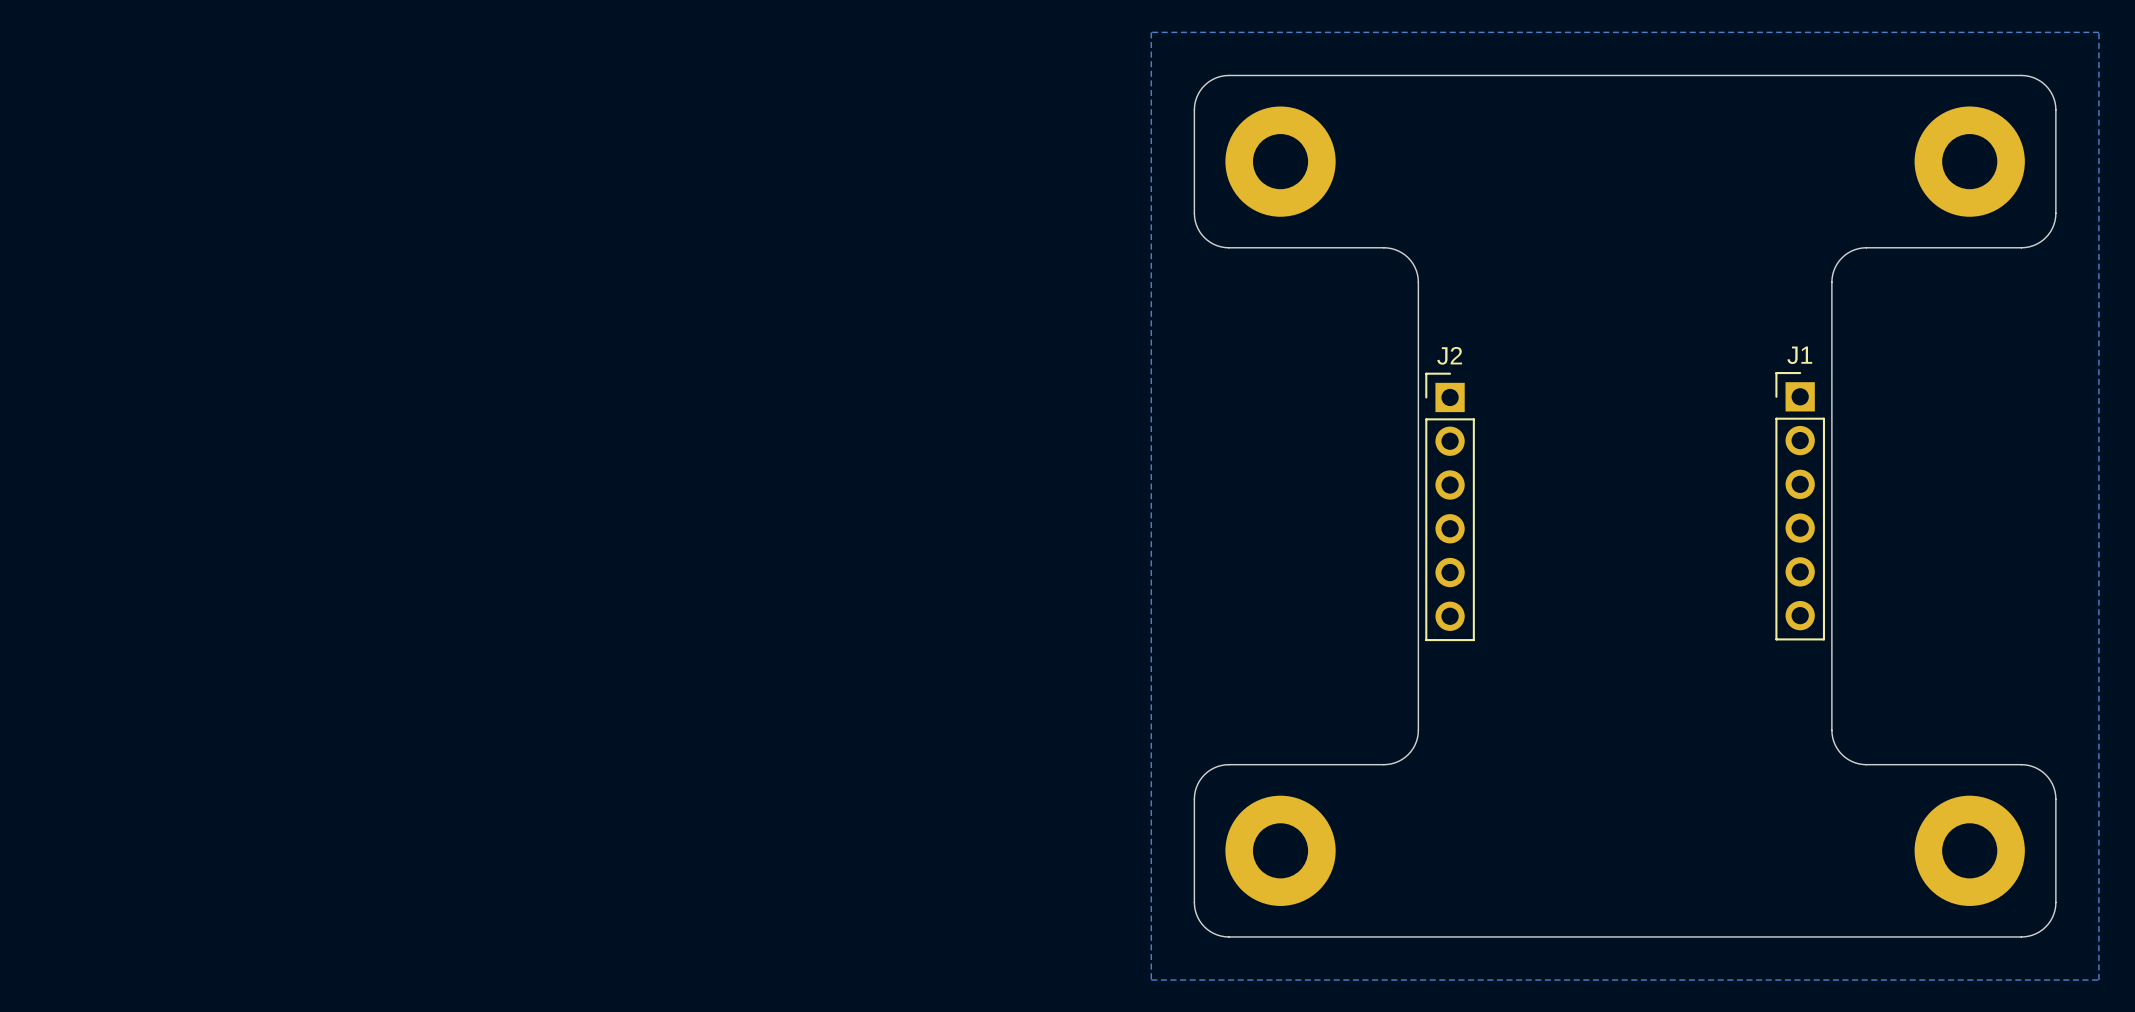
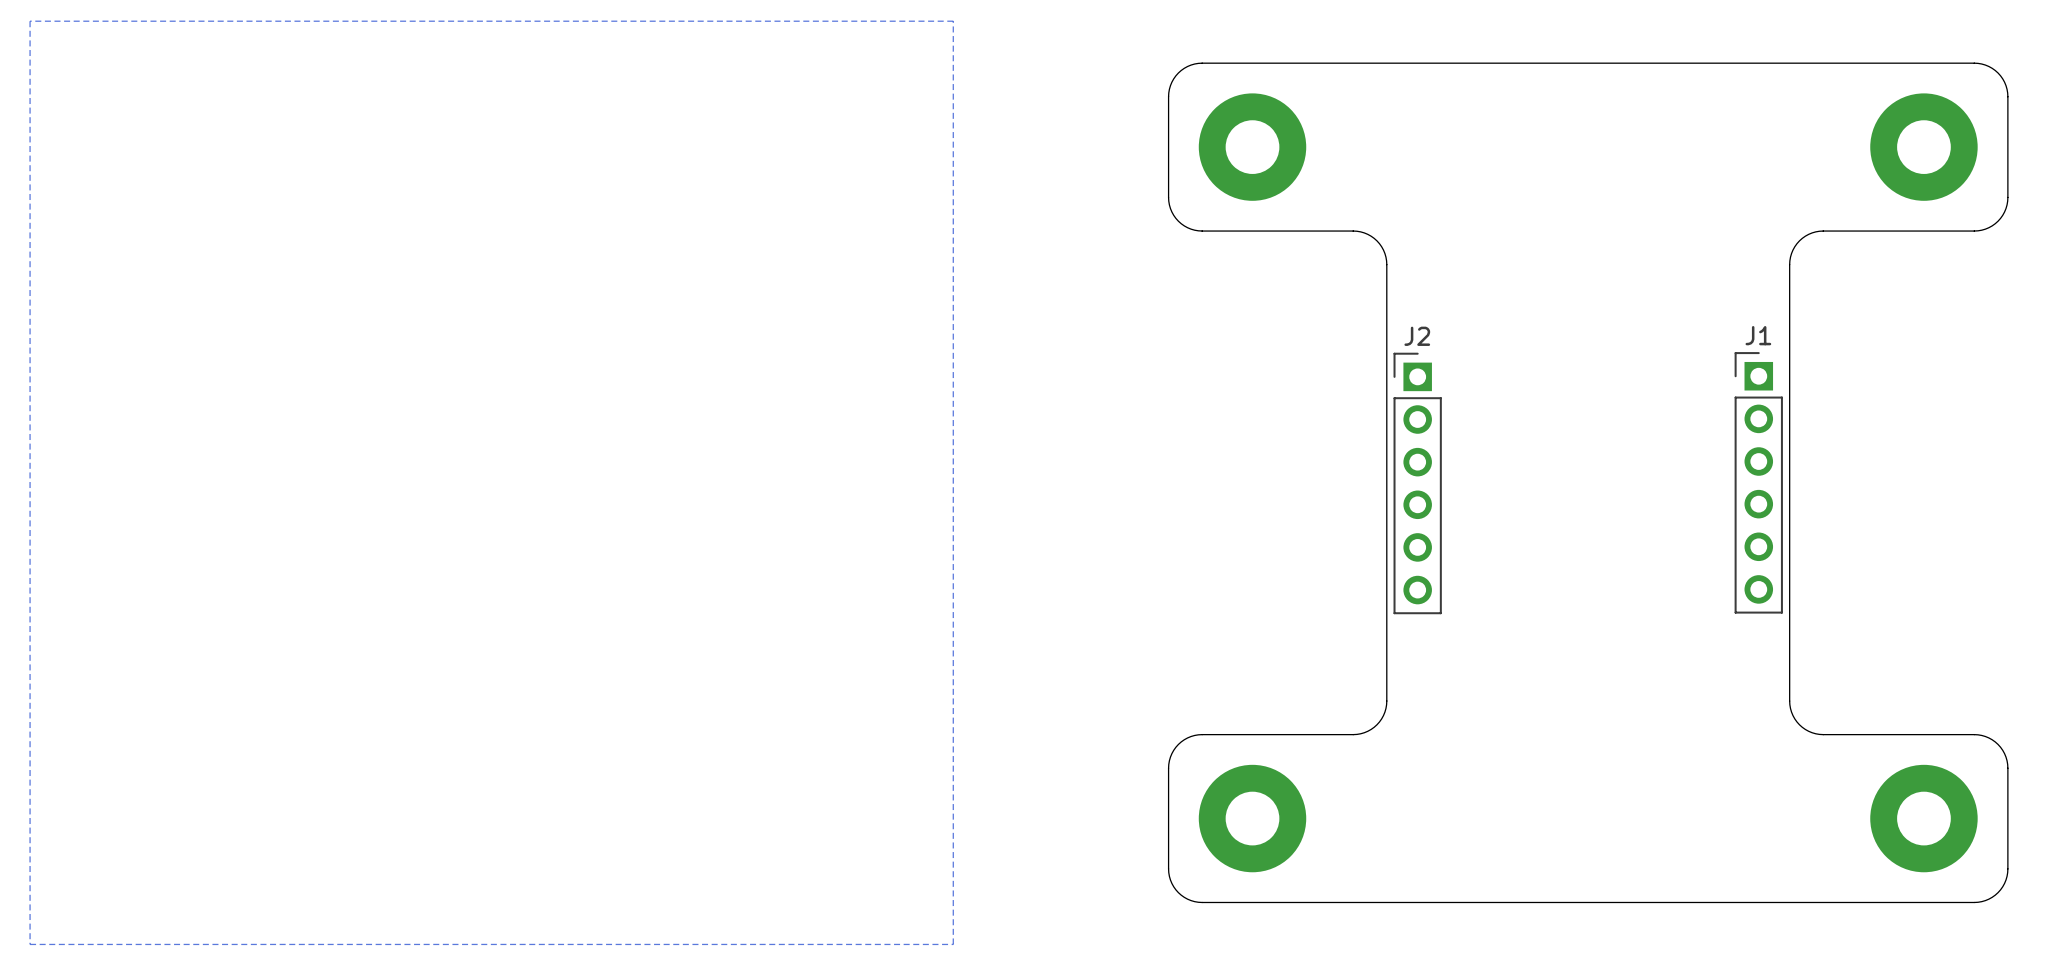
zone outline: none -> (953, 21) (30, 21) (30, 944) (953, 944) (953, 21)
zone outline: (2098, 32) (1151, 32) (1151, 980) (2098, 980) (2098, 32) -> none

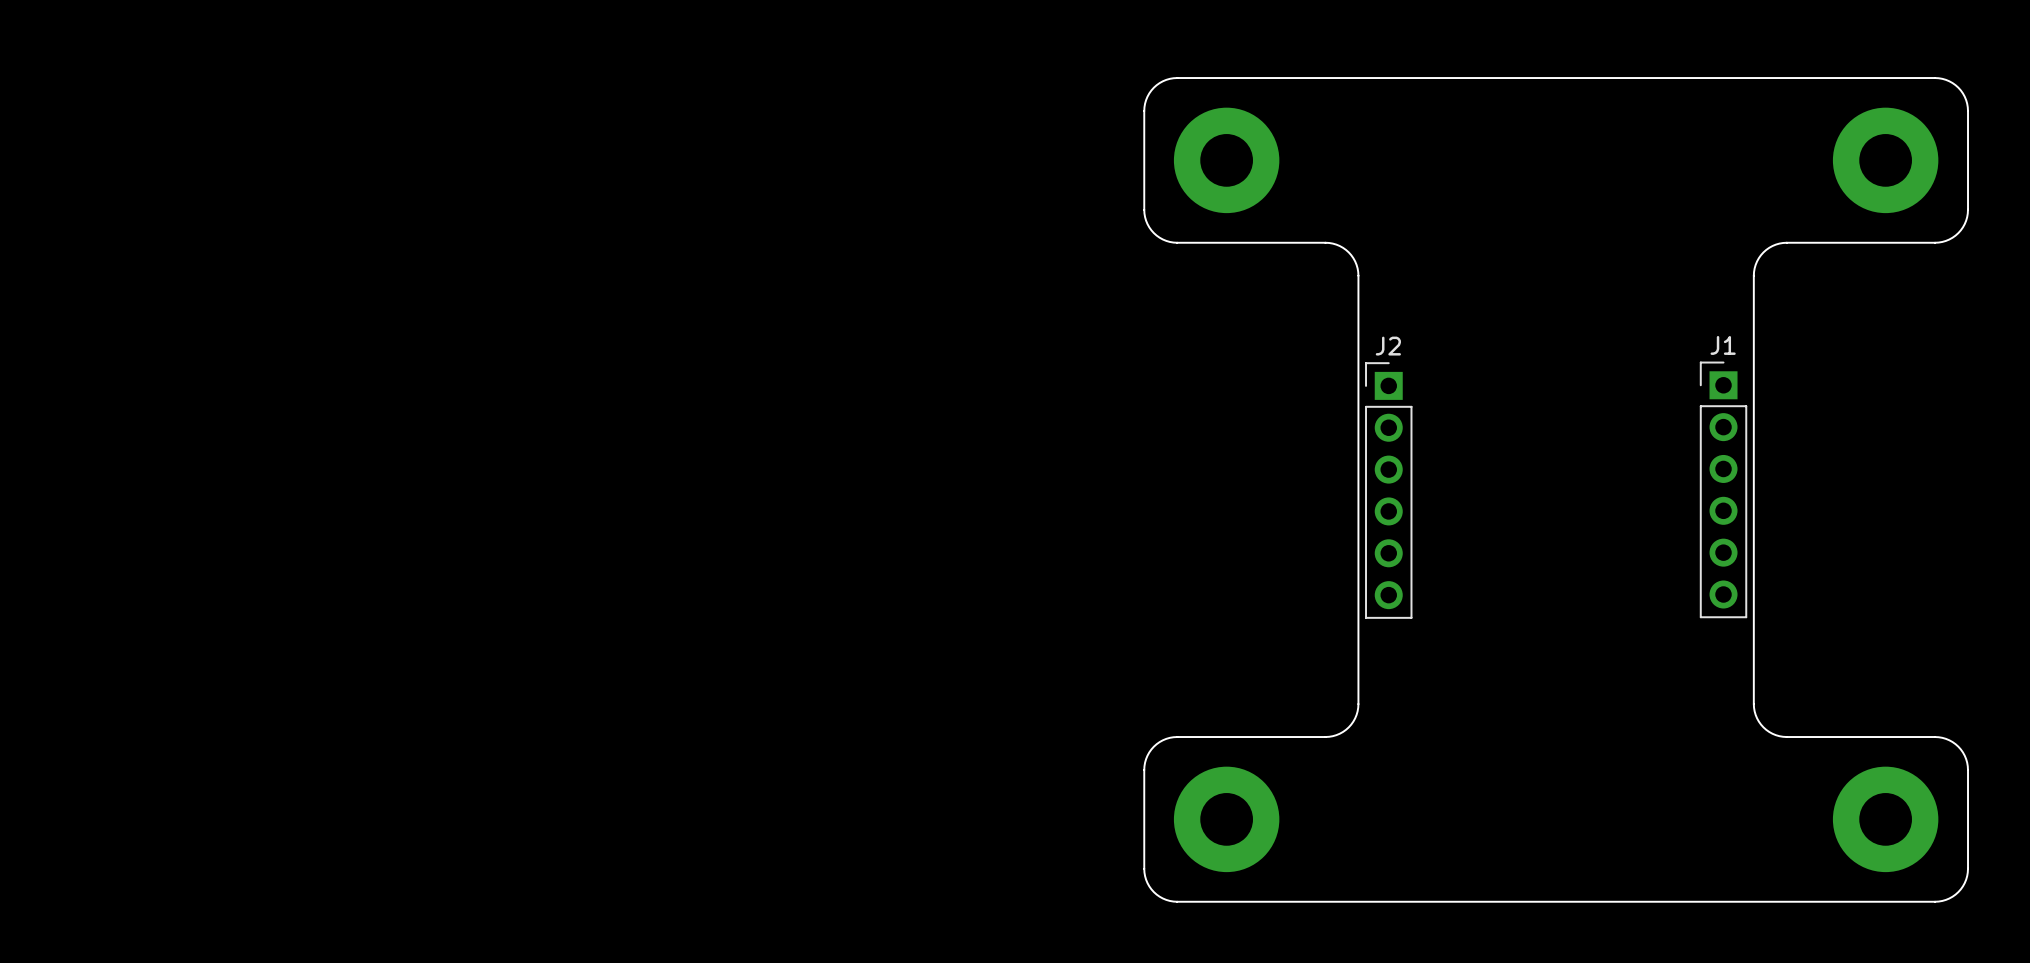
zone outline: (953, 21) (30, 21) (30, 944) (953, 944) (953, 21) -> none

